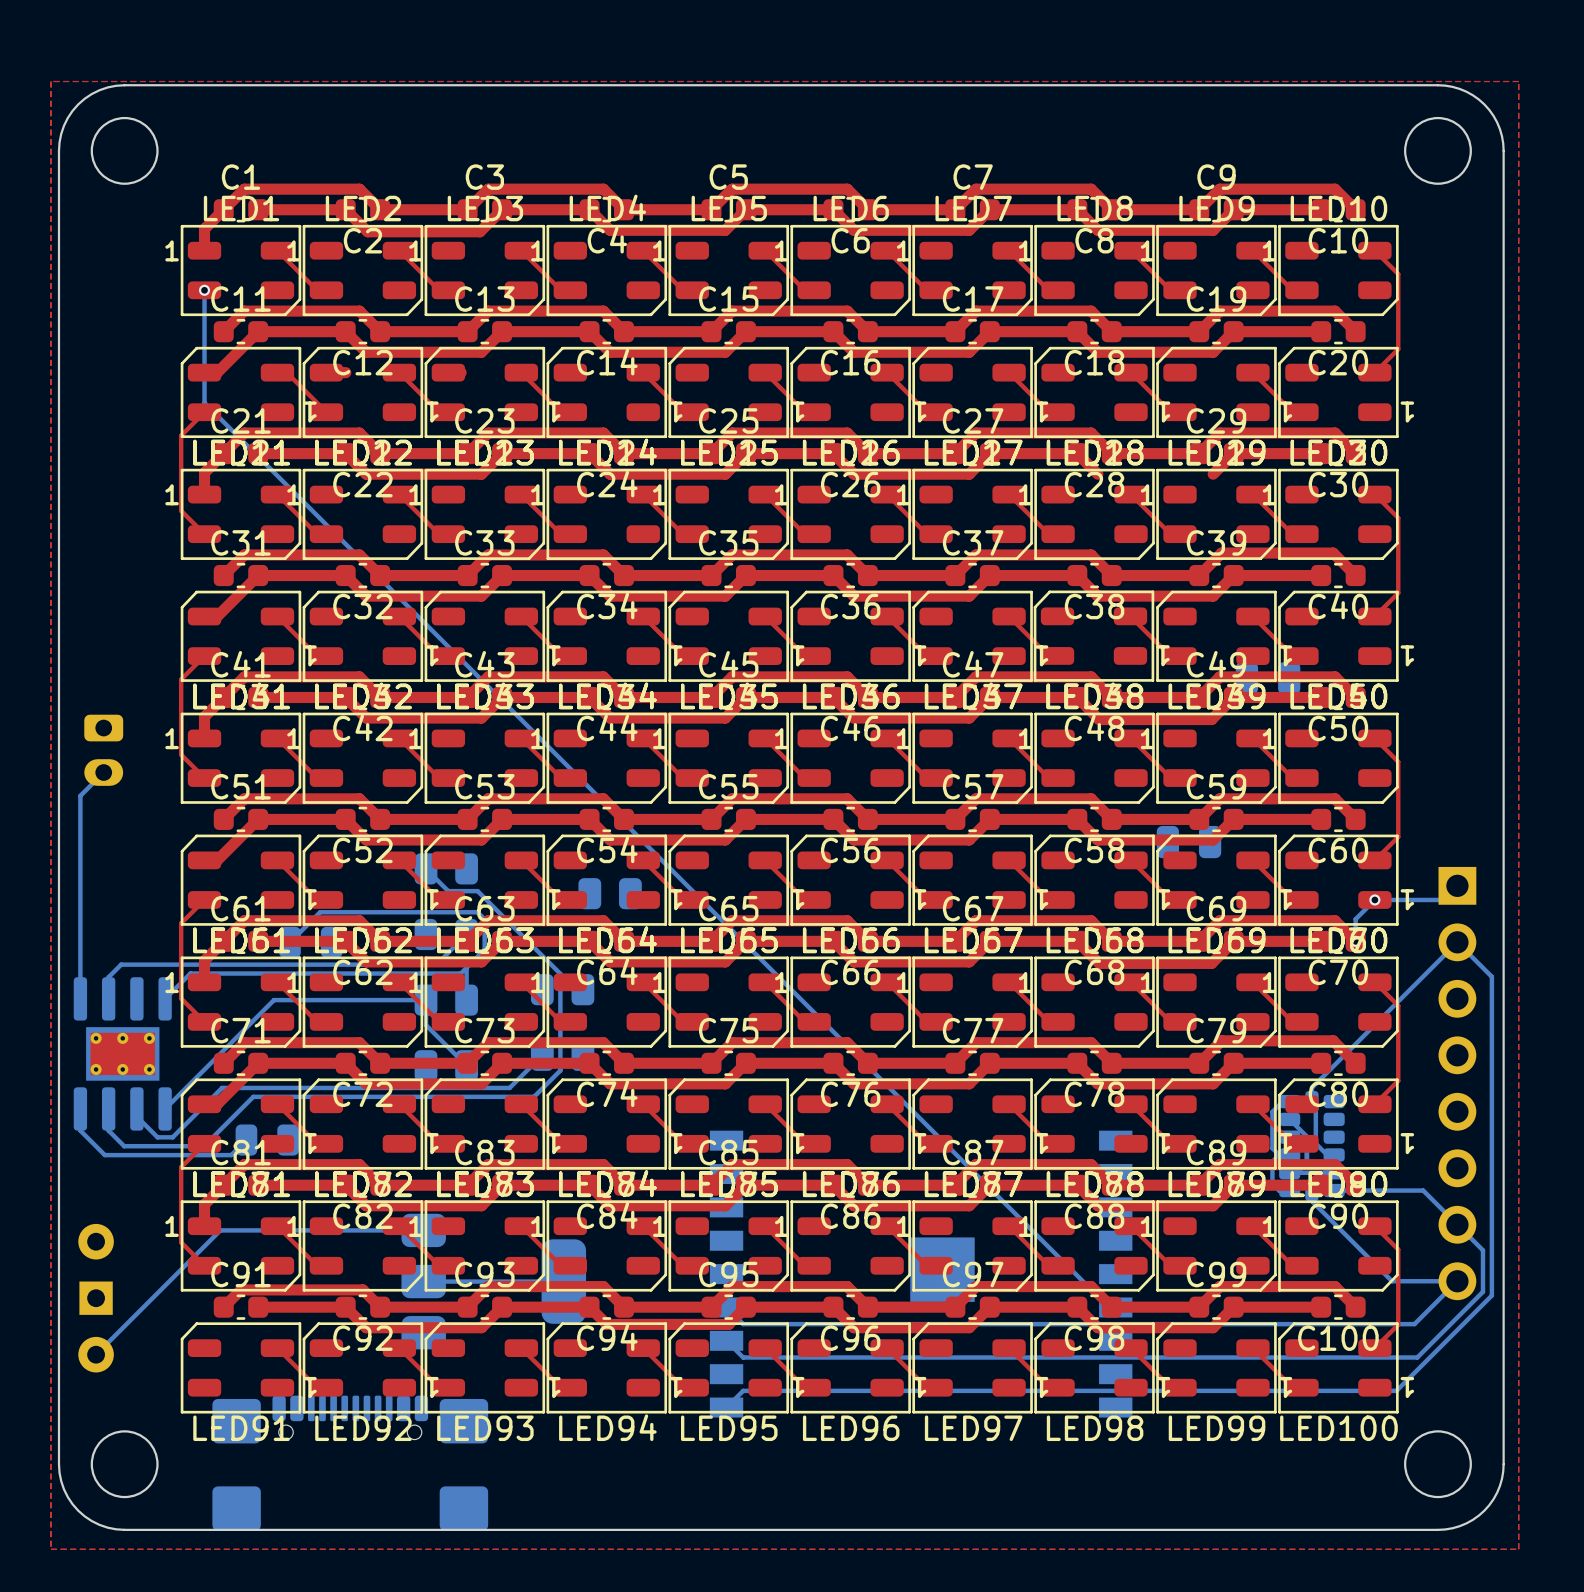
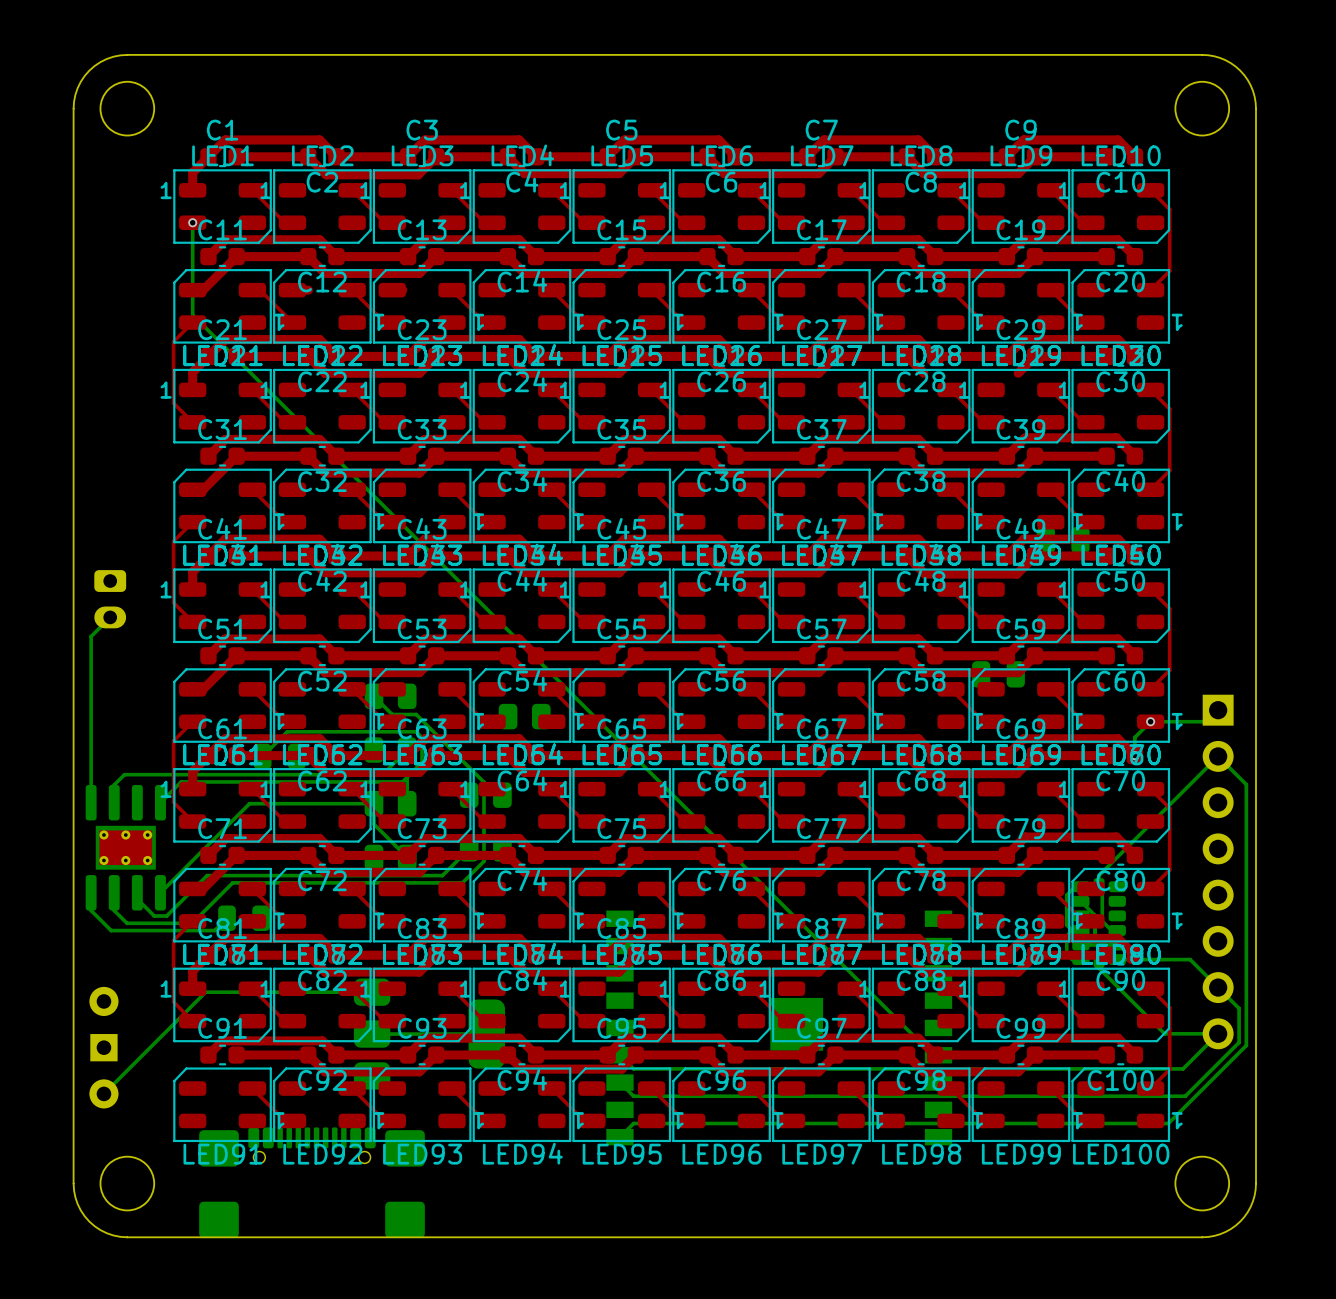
top zone outline: (50, 81) (1518, 81) (1518, 1549) (50, 1549) (50, 81) -> none

